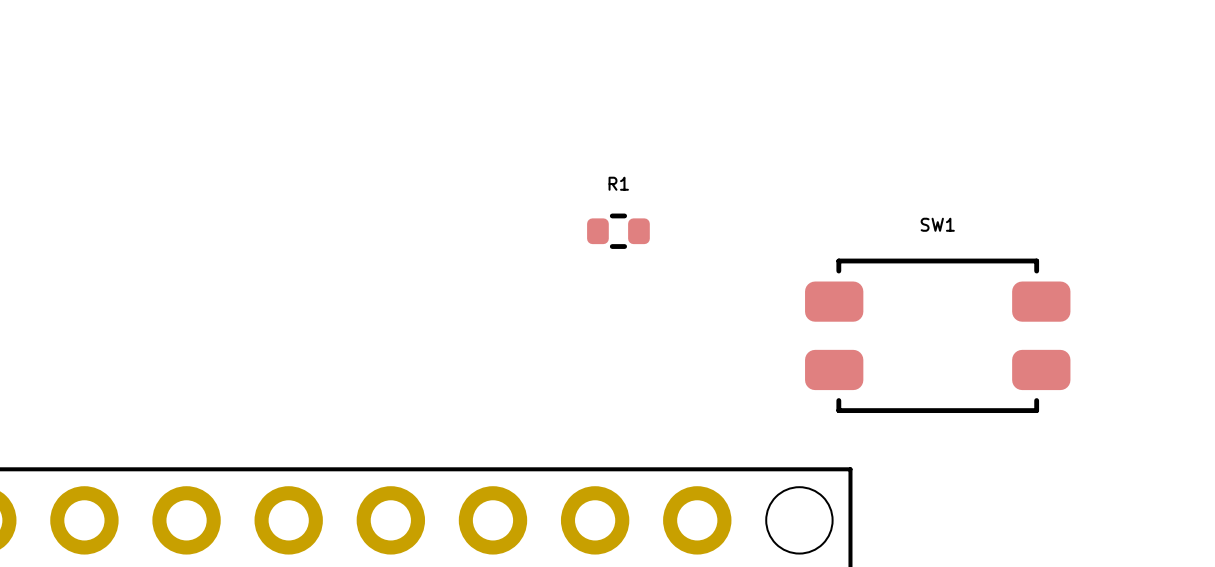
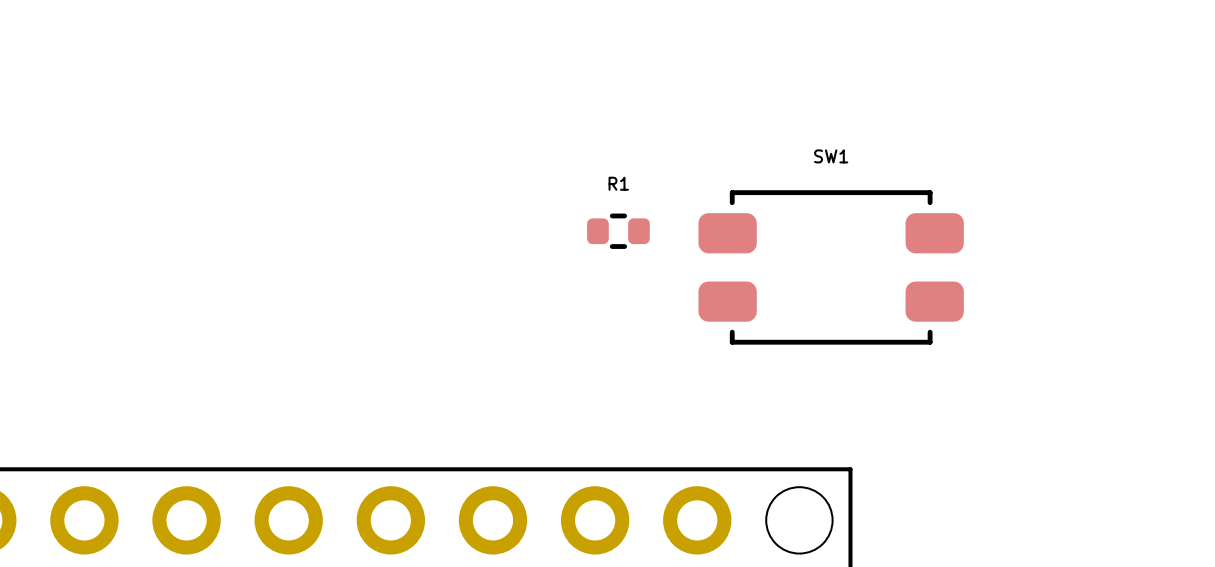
SW1 position: (937, 335) -> (831, 267)

